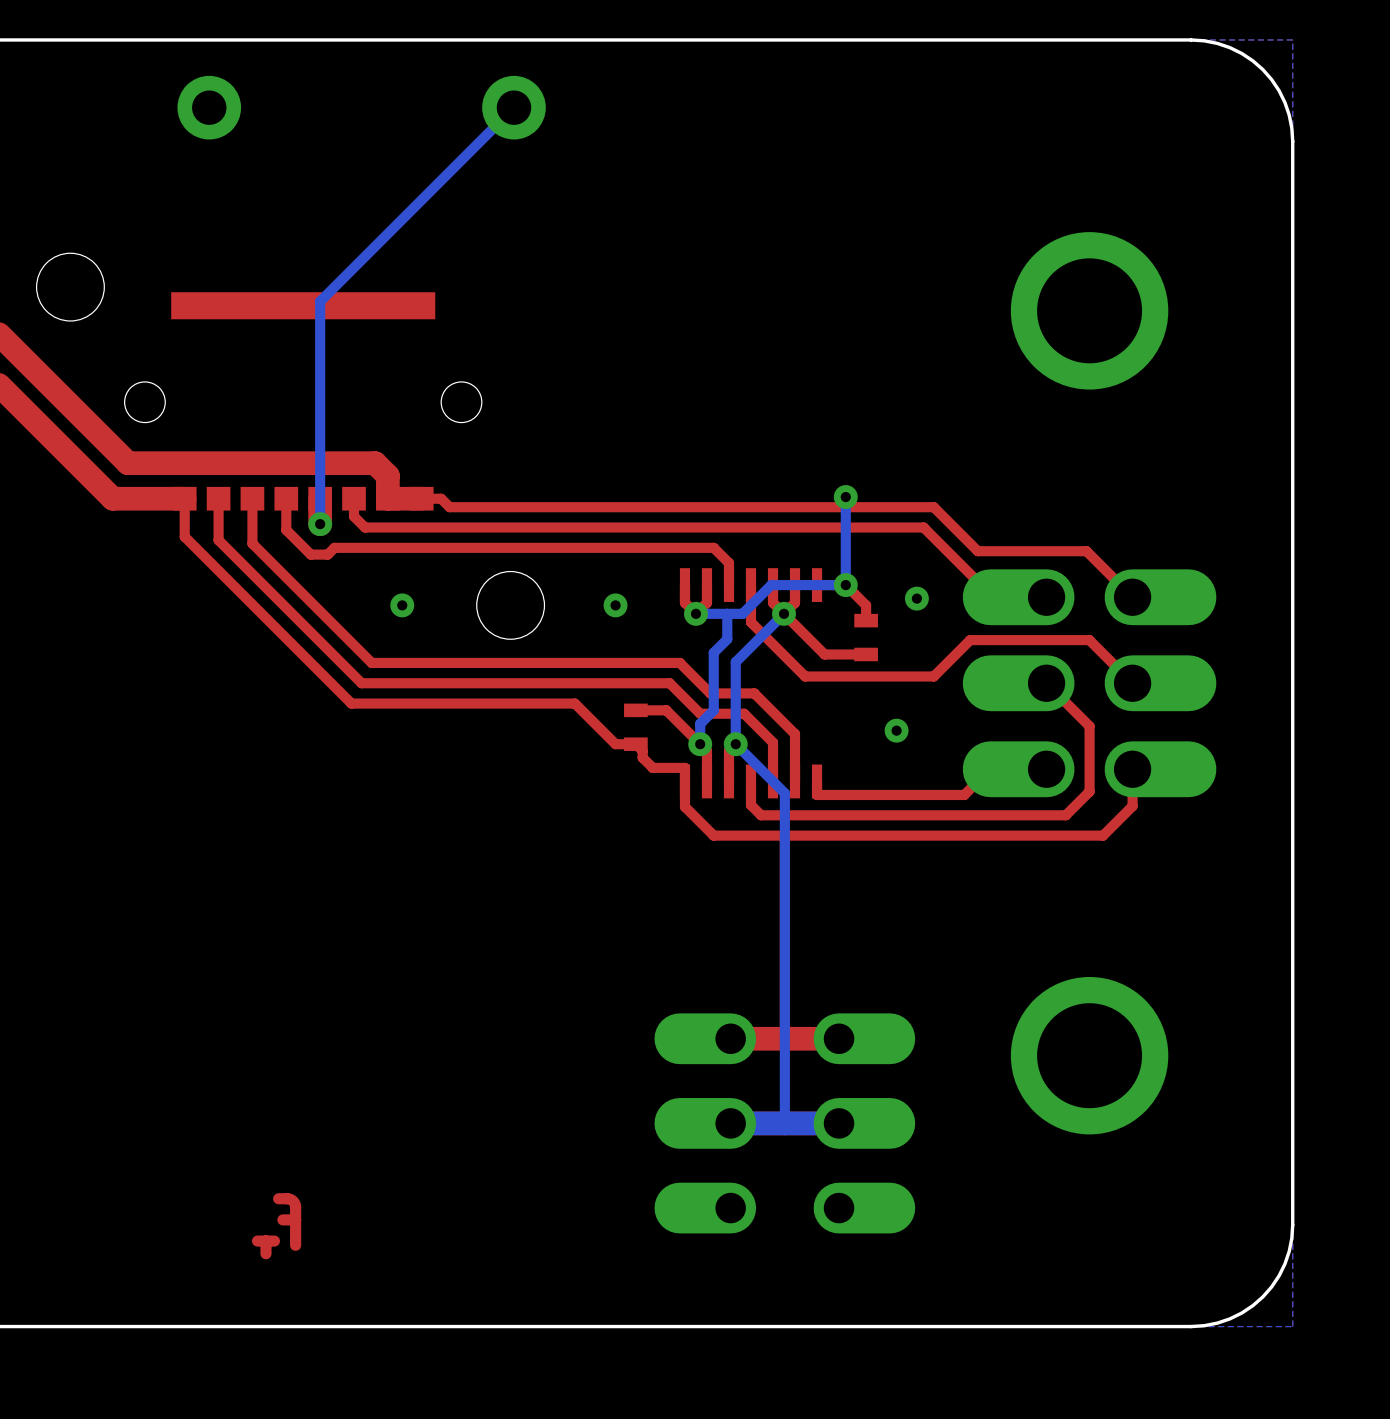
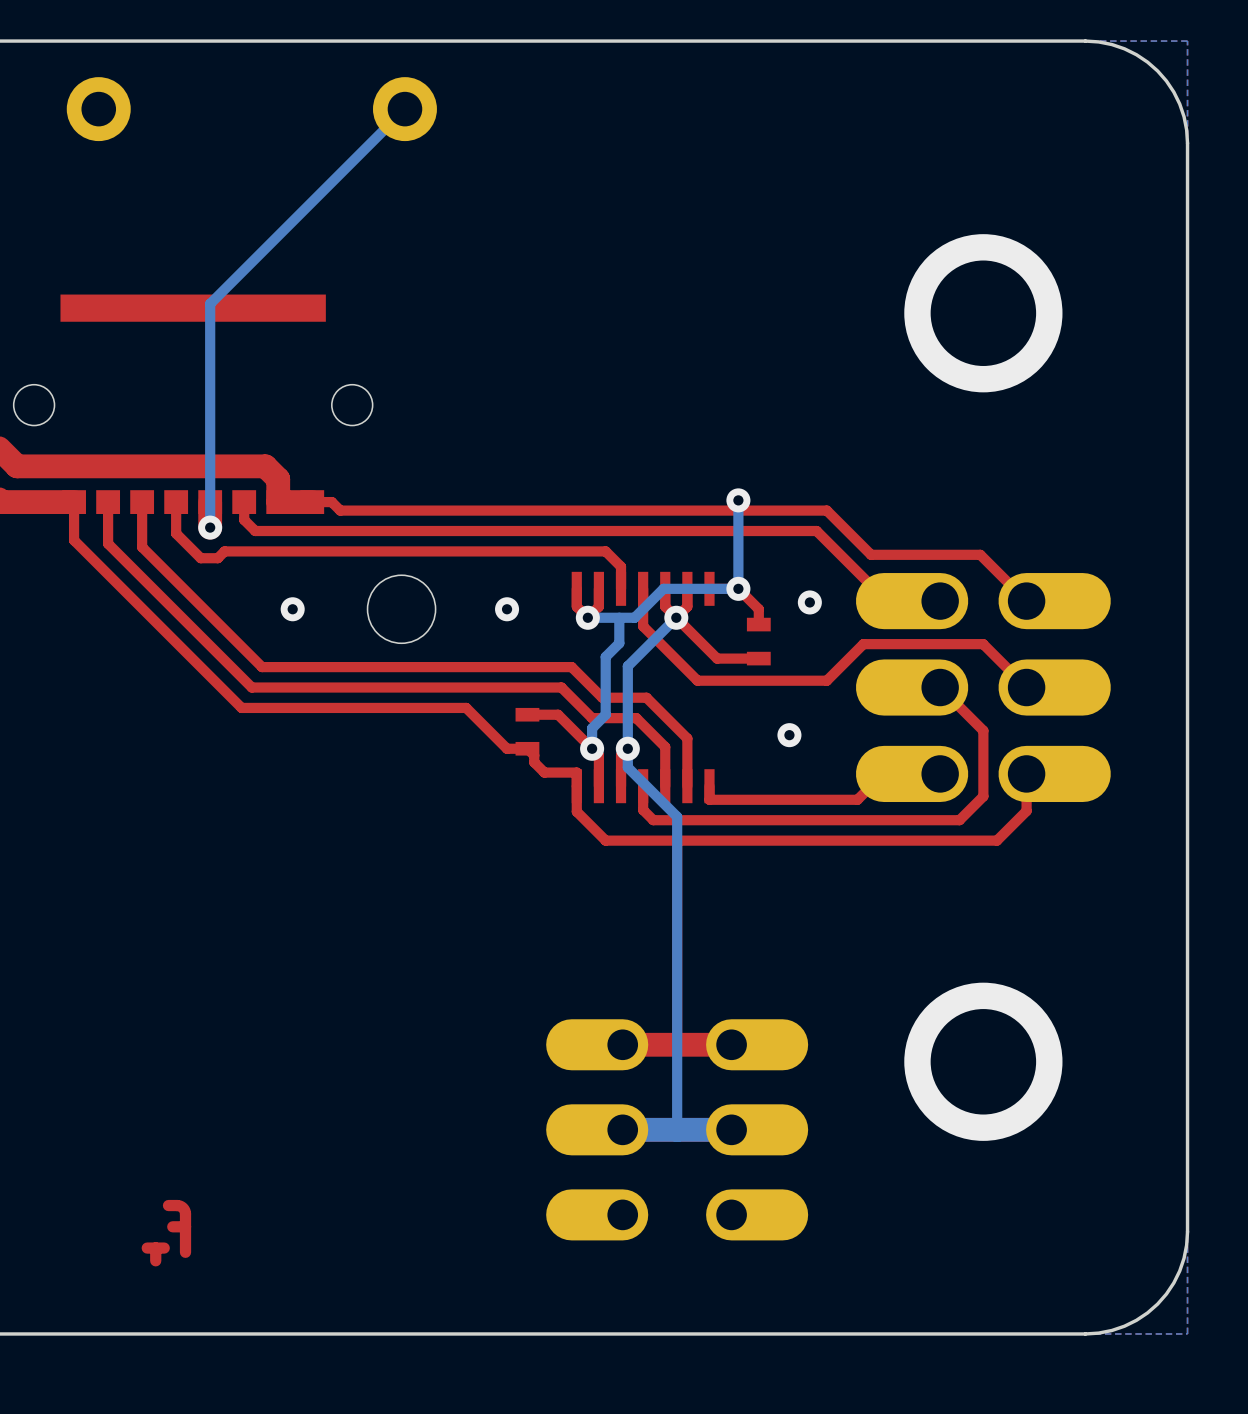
bottom track: (735, 744) (784, 793) (784, 811) -> (627, 748) (627, 767) (677, 816)

